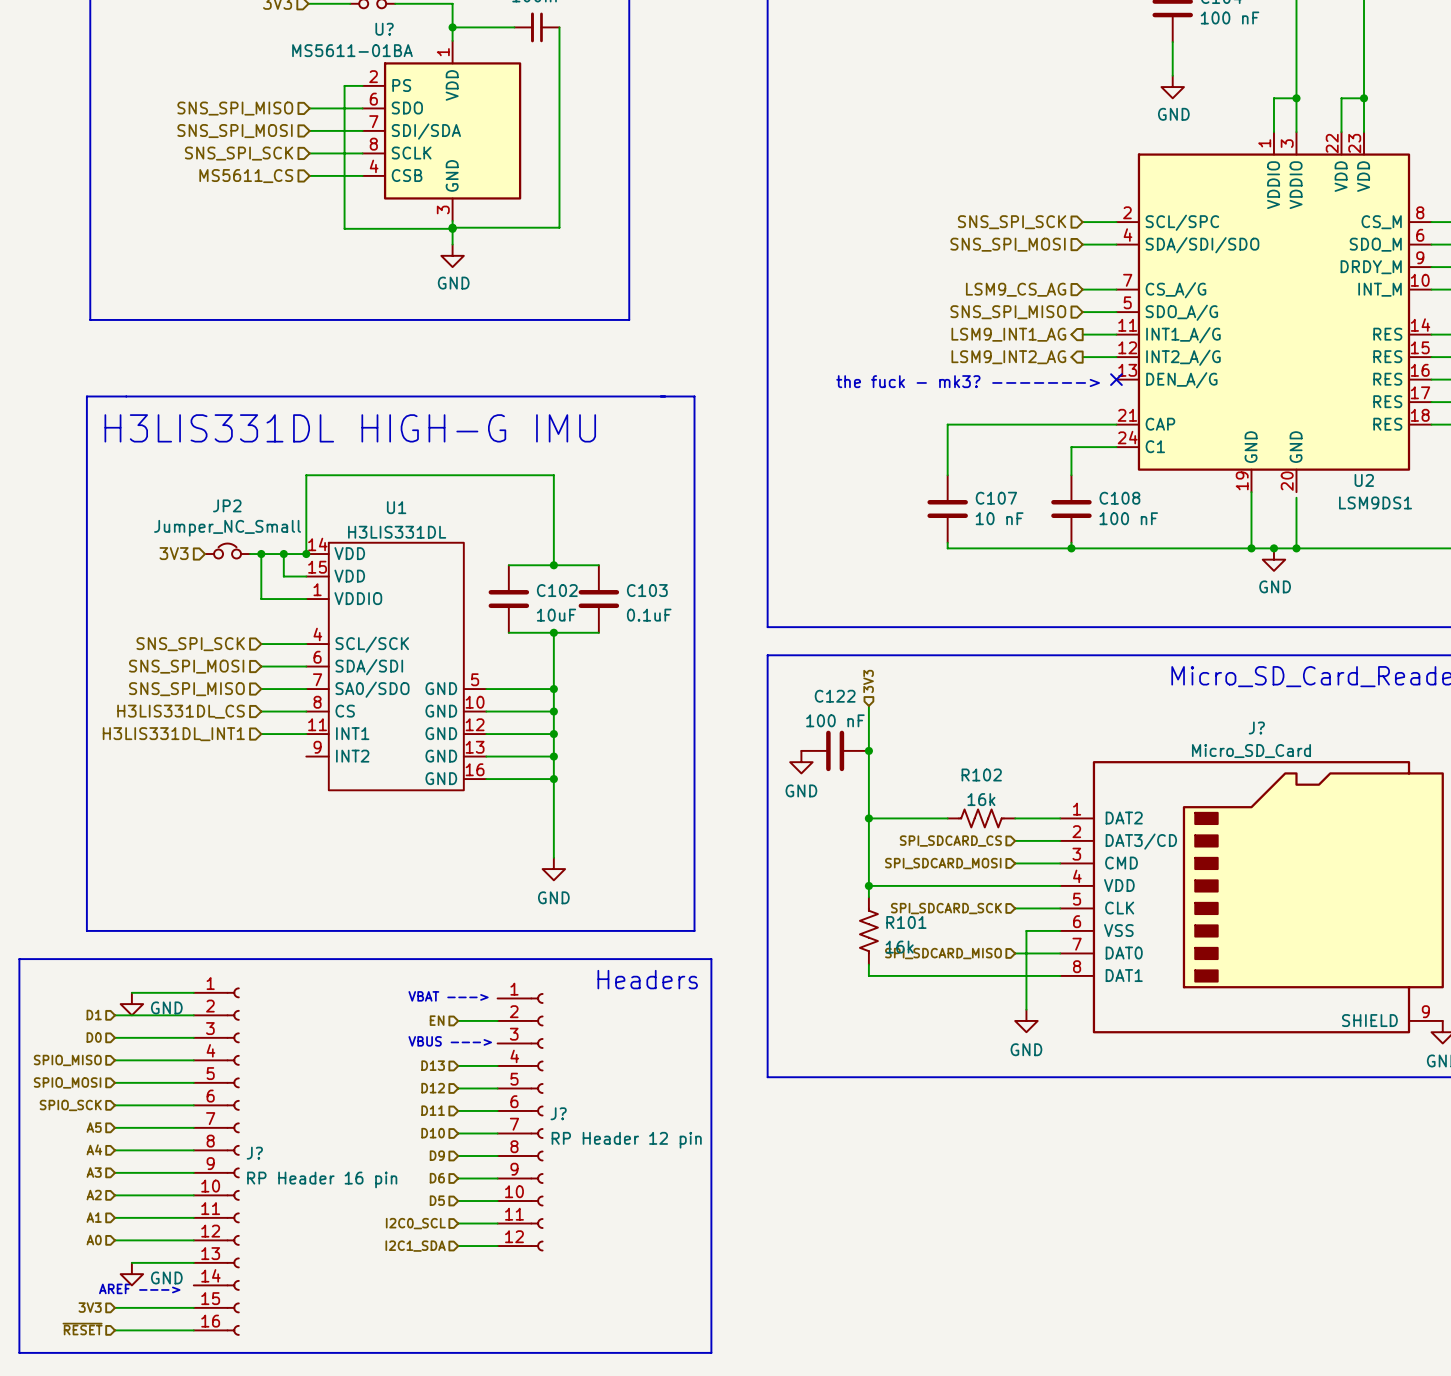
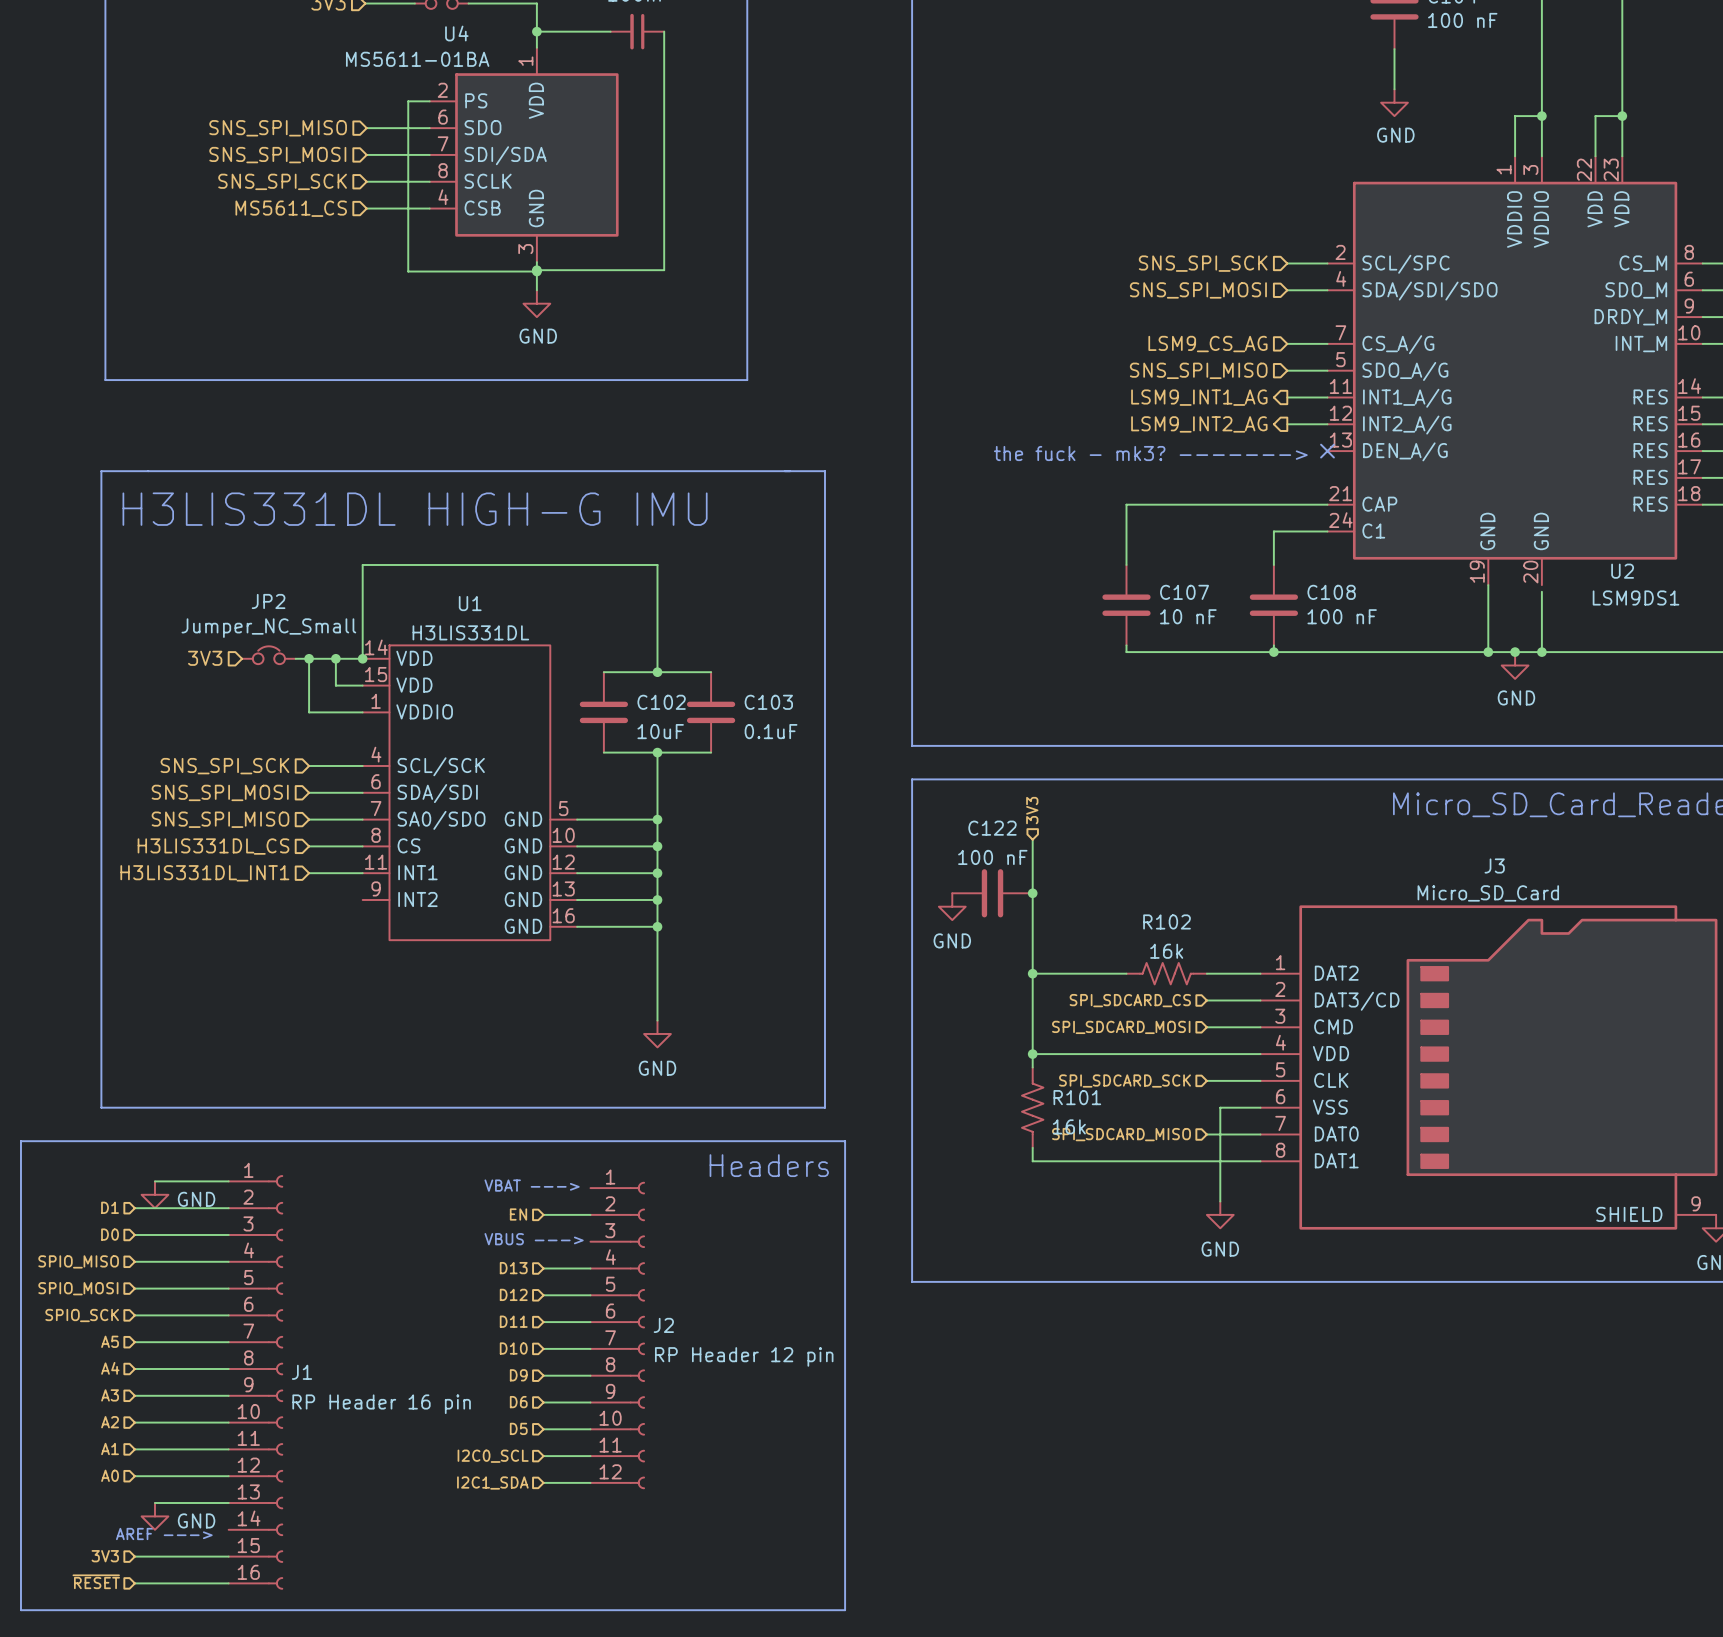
U? name: U? (384, 29) -> U4 (456, 33)
J? name: J? (1256, 728) -> J3 (1494, 865)
J? name: J? (558, 1113) -> J2 (663, 1325)
J? name: J? (254, 1153) -> J1 (302, 1372)

